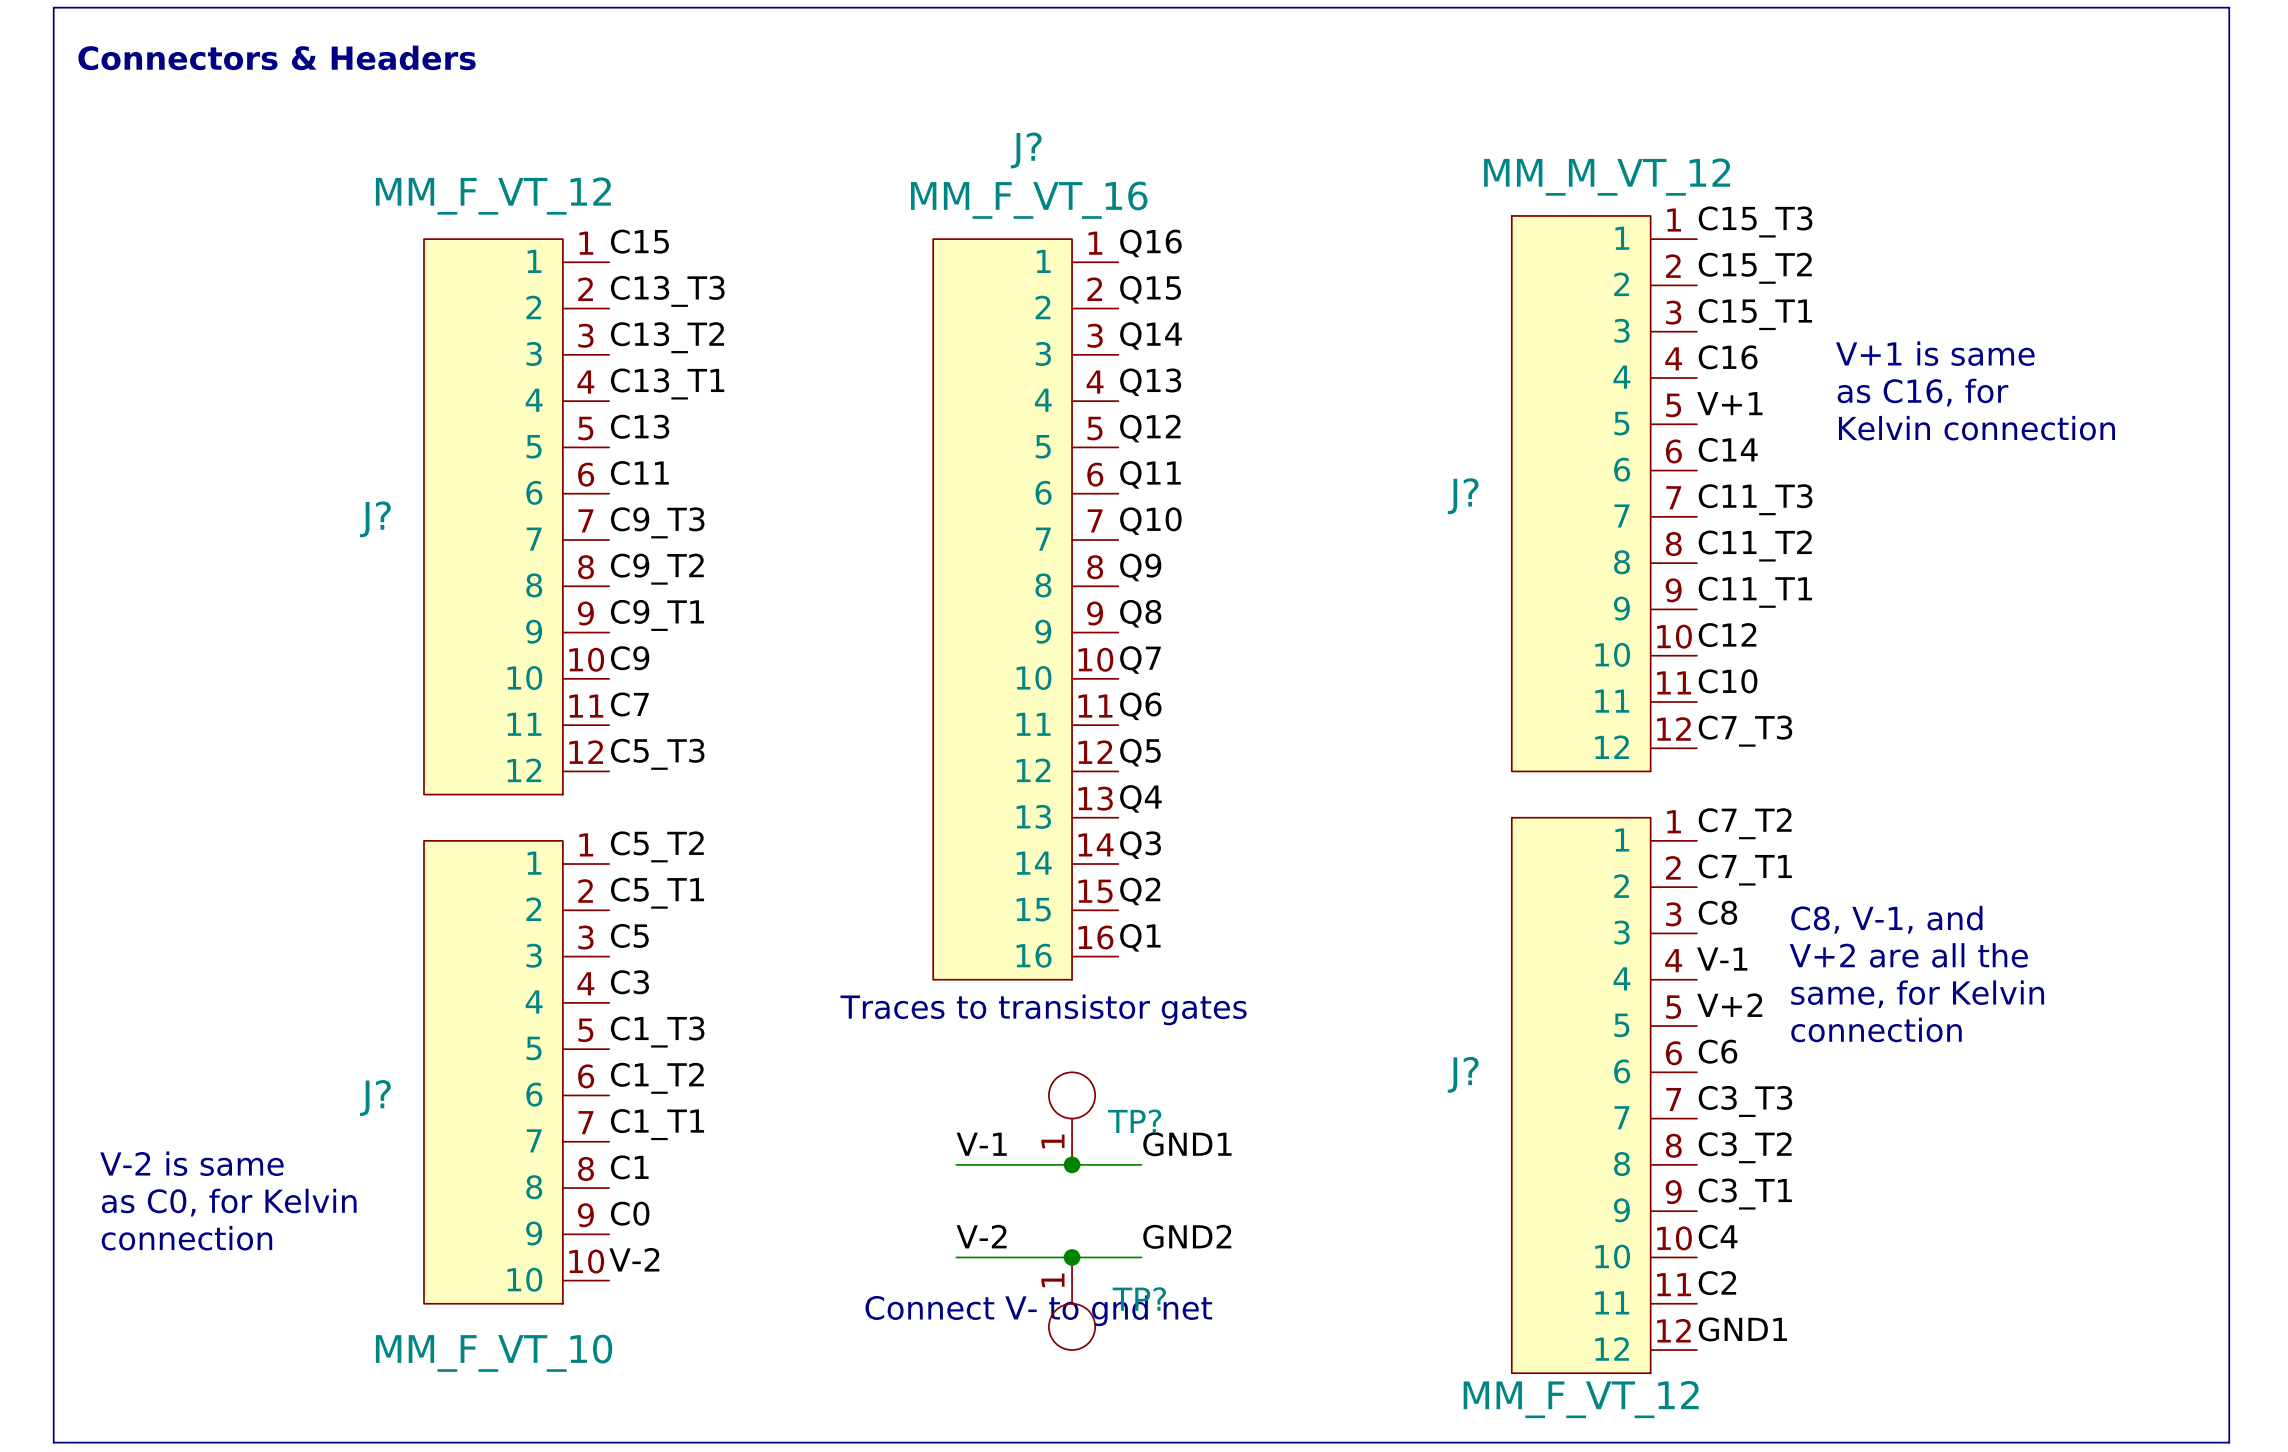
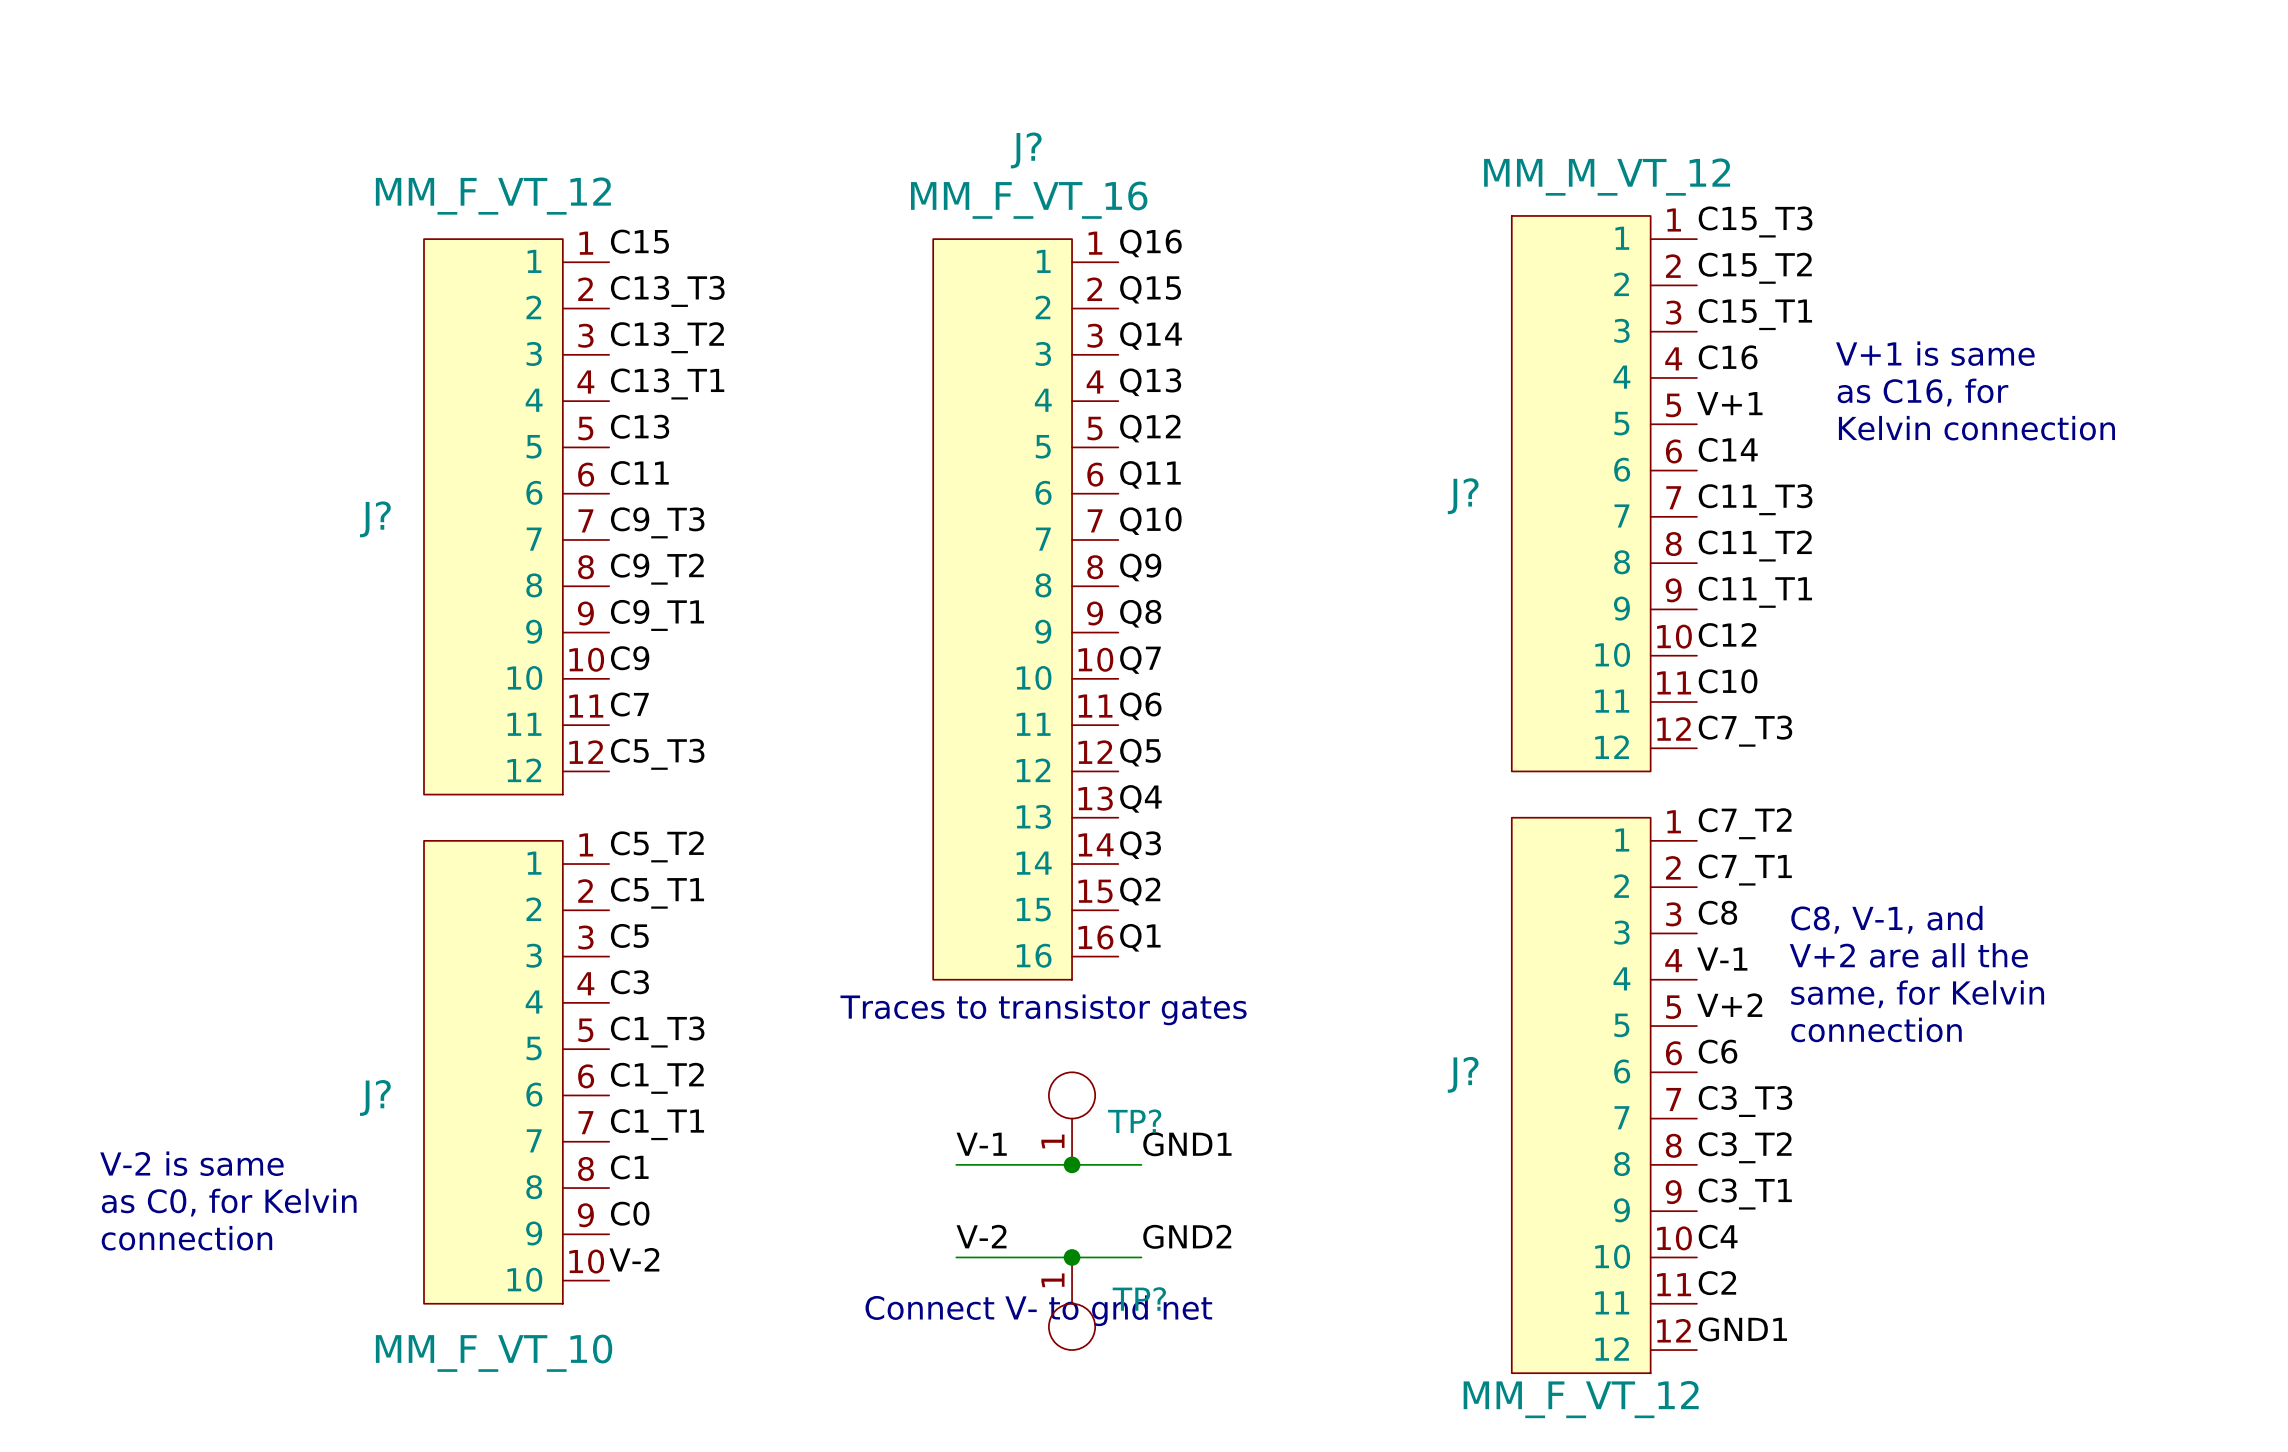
line: (53, 7) (53, 1442) (2229, 1442) (2229, 7) (53, 7) -> none
text: Connectors & Headers (277, 57) -> none

